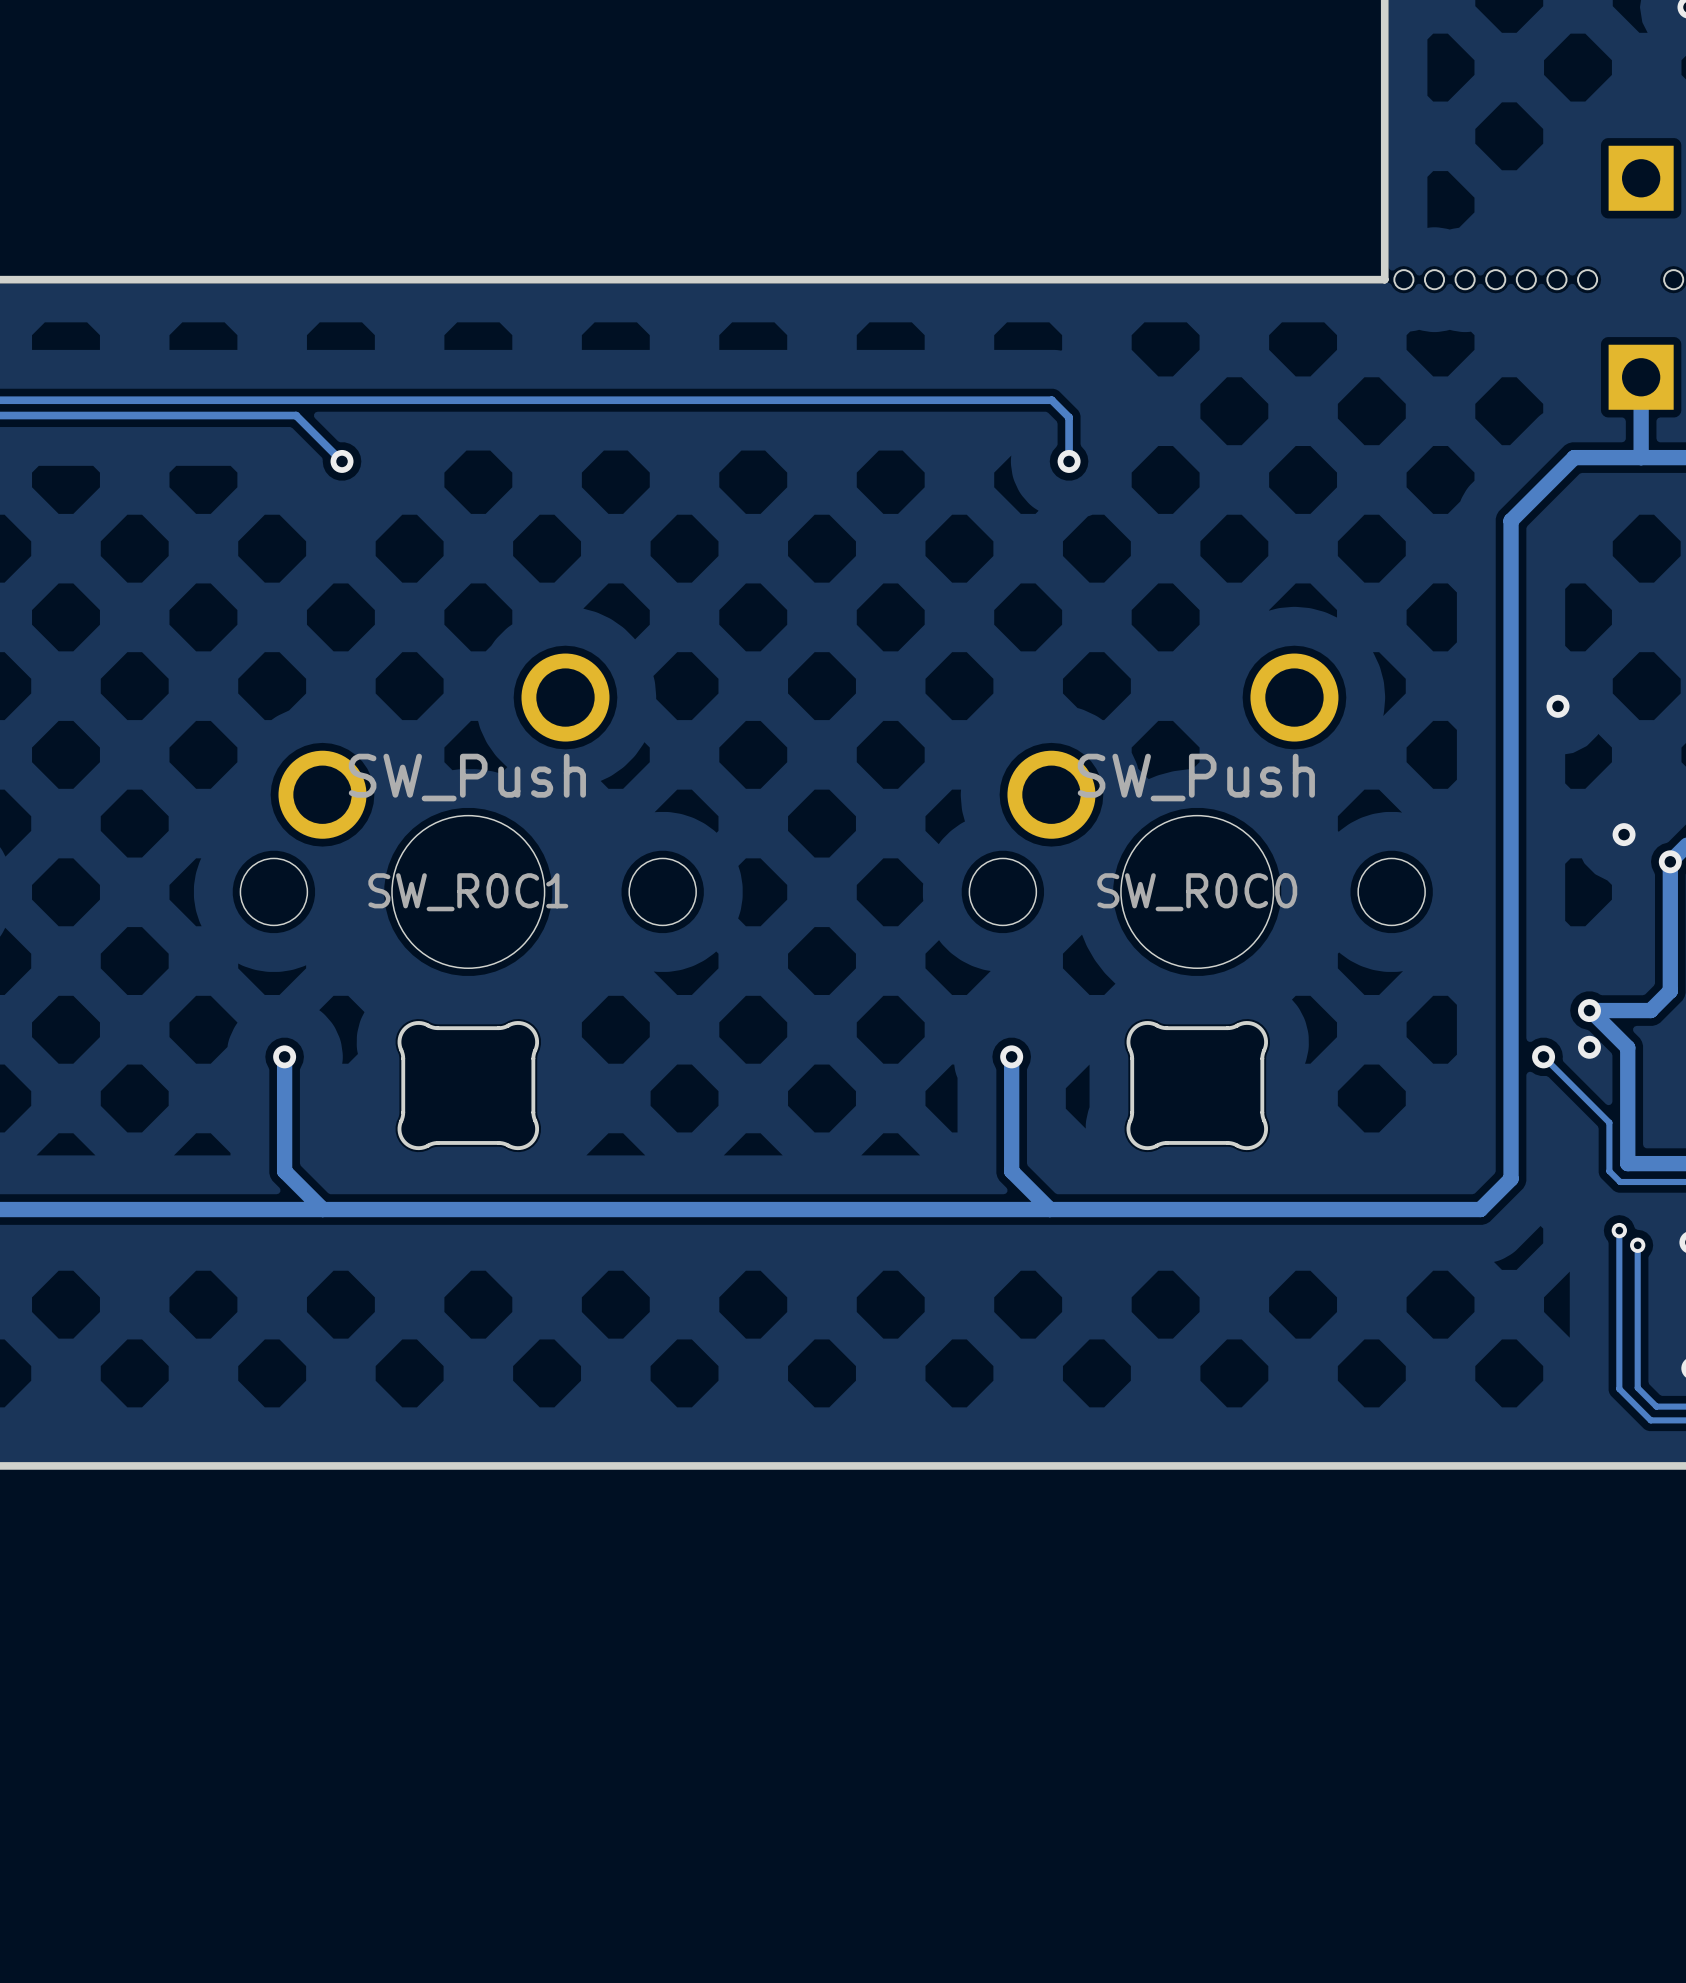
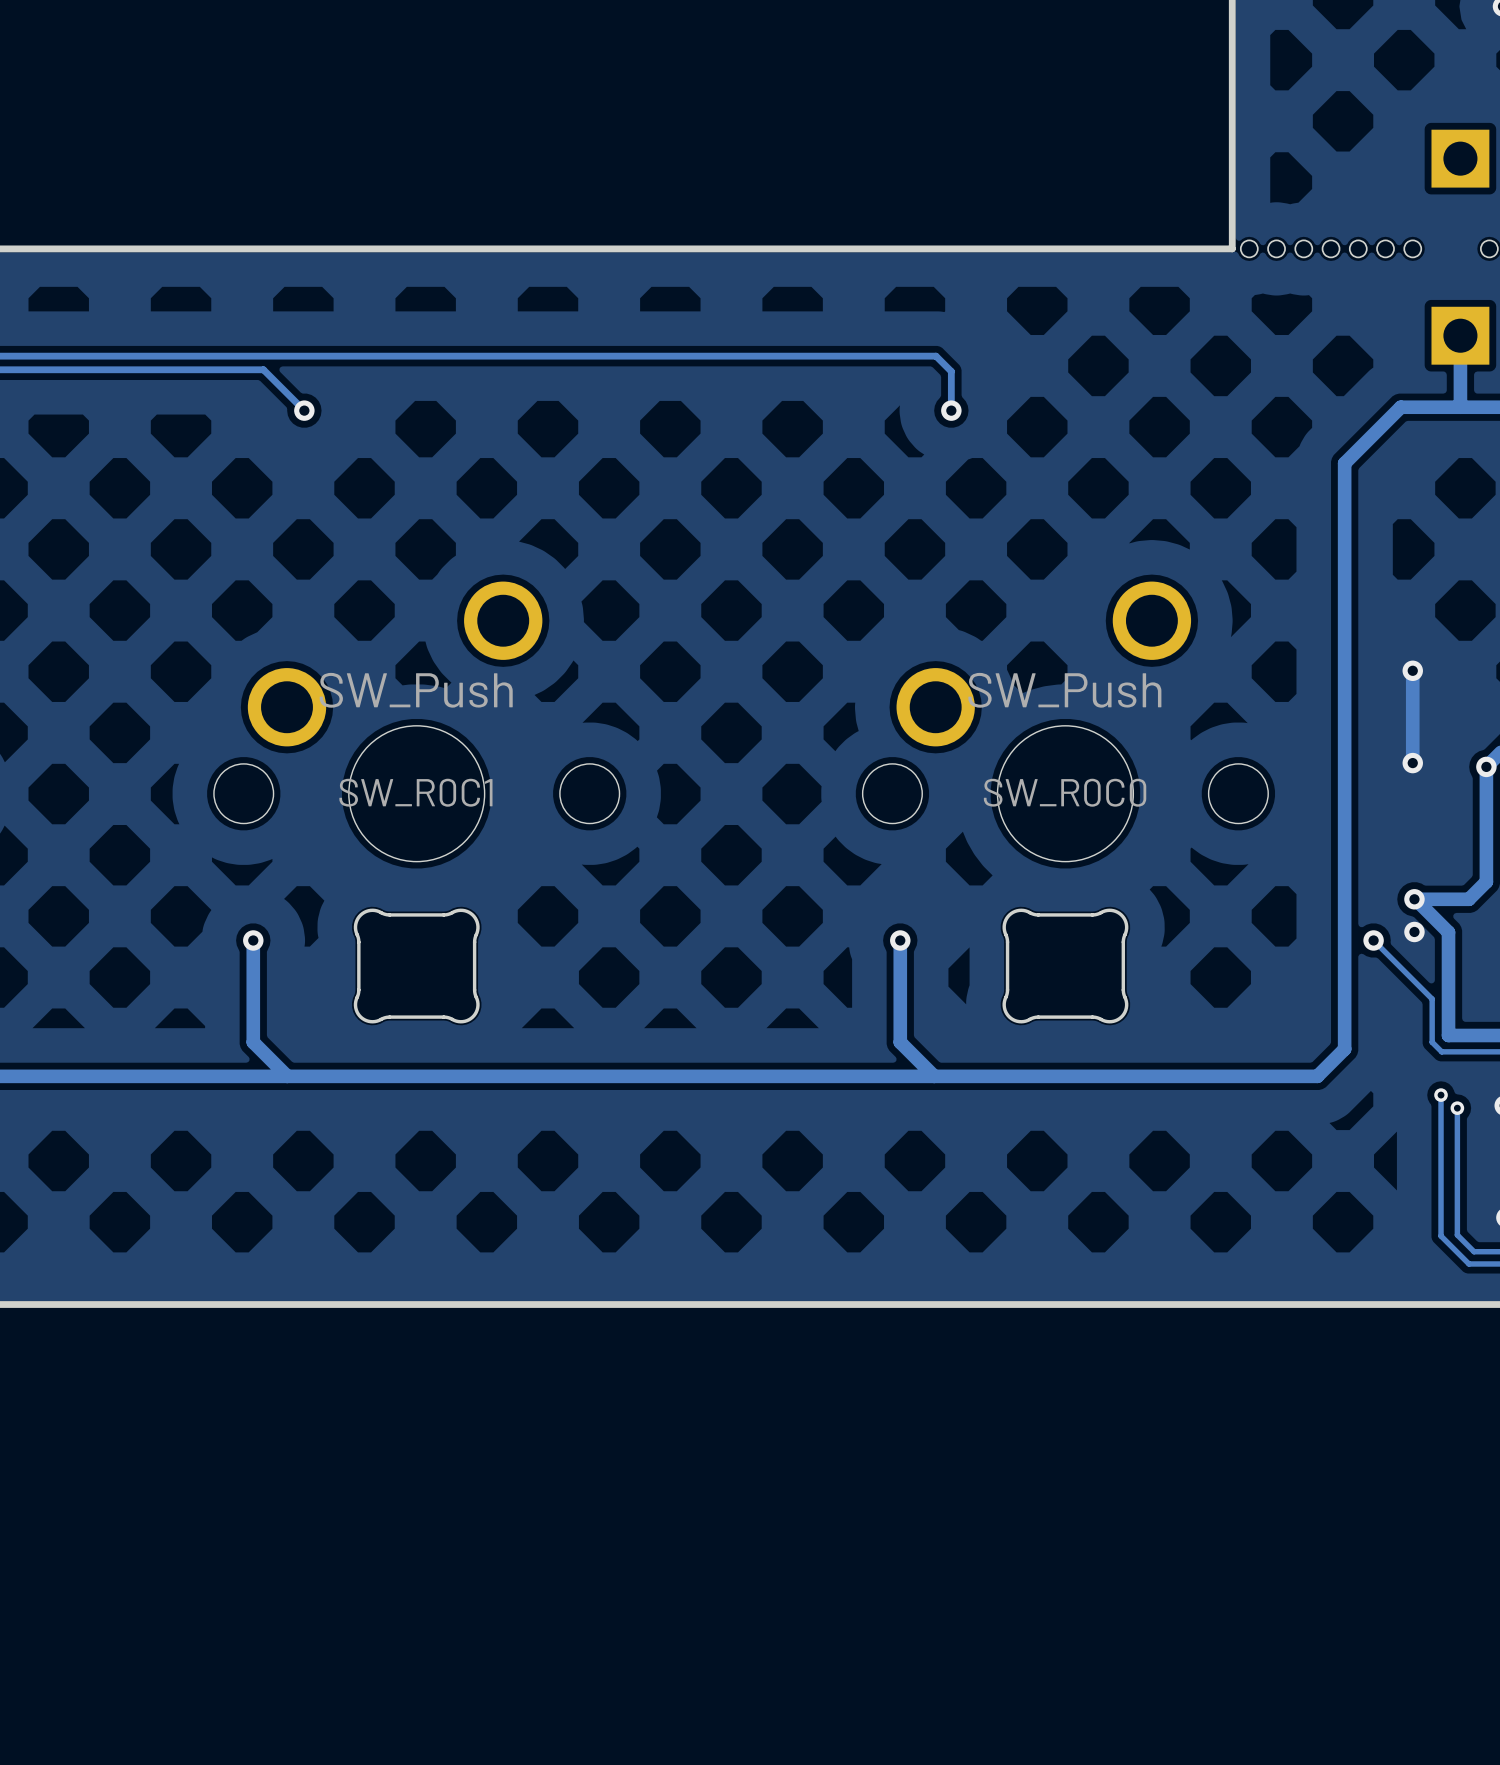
via: (1558, 706) -> none
track: none -> (1412, 670) (1412, 763)
via: none -> (1412, 670)
via position: (1624, 834) -> (1412, 763)

